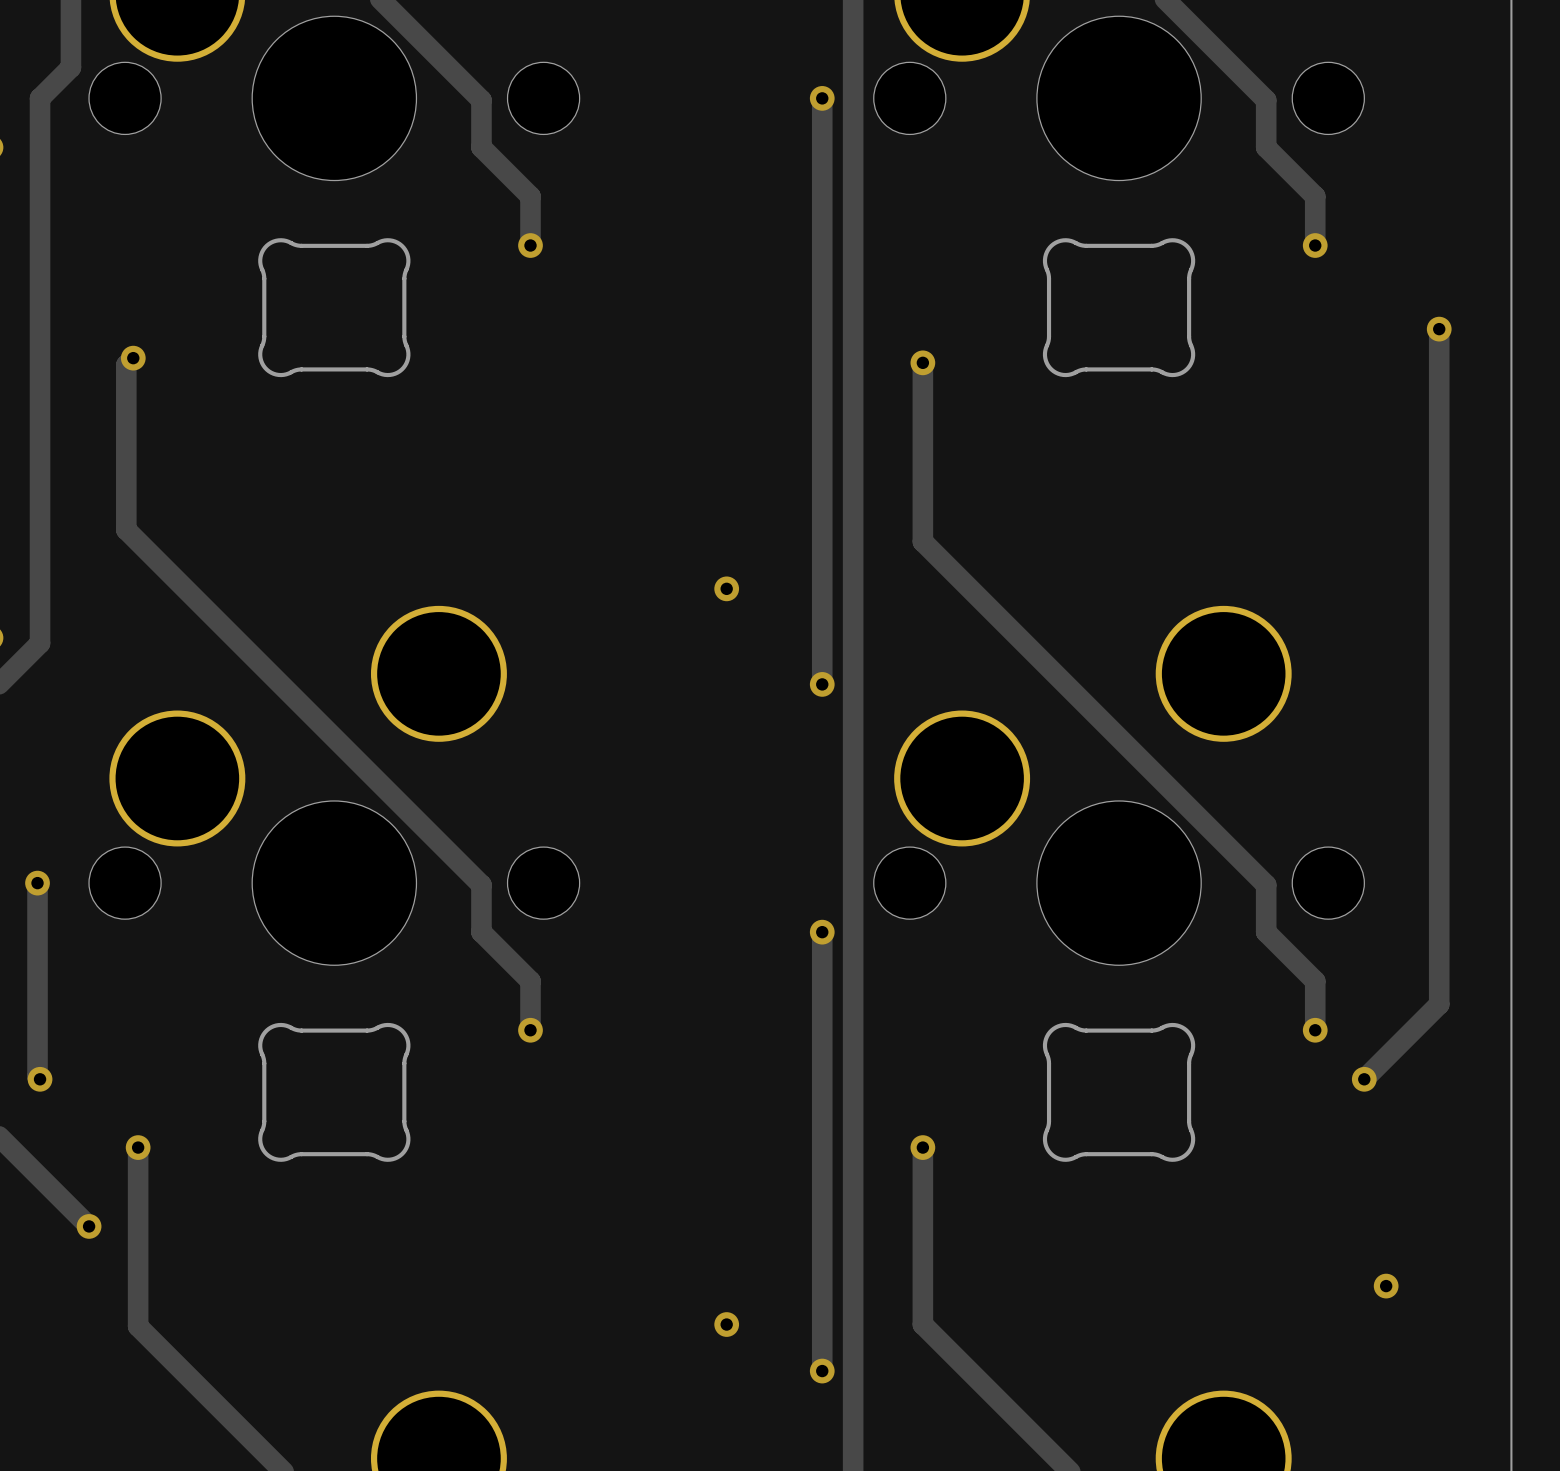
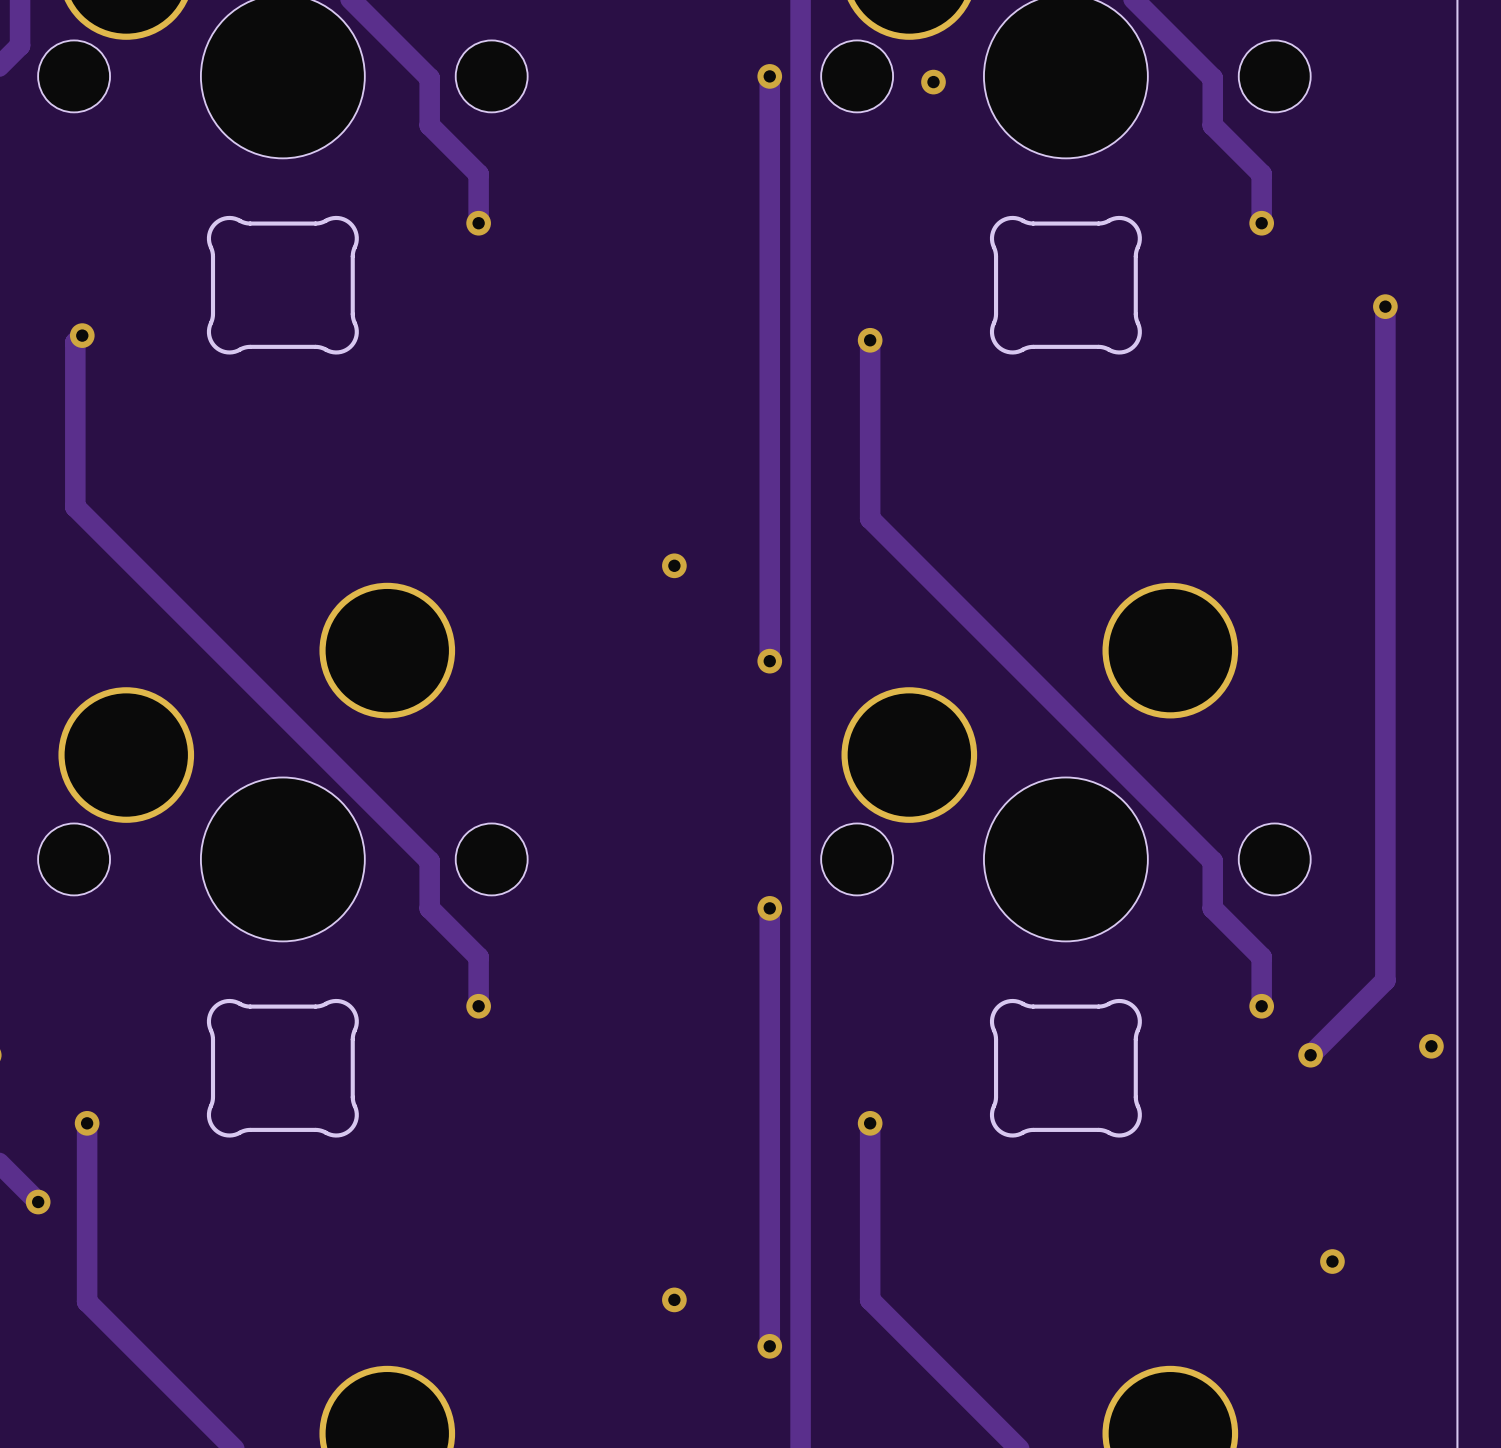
via: none -> (933, 82)
via: none -> (1431, 1046)

